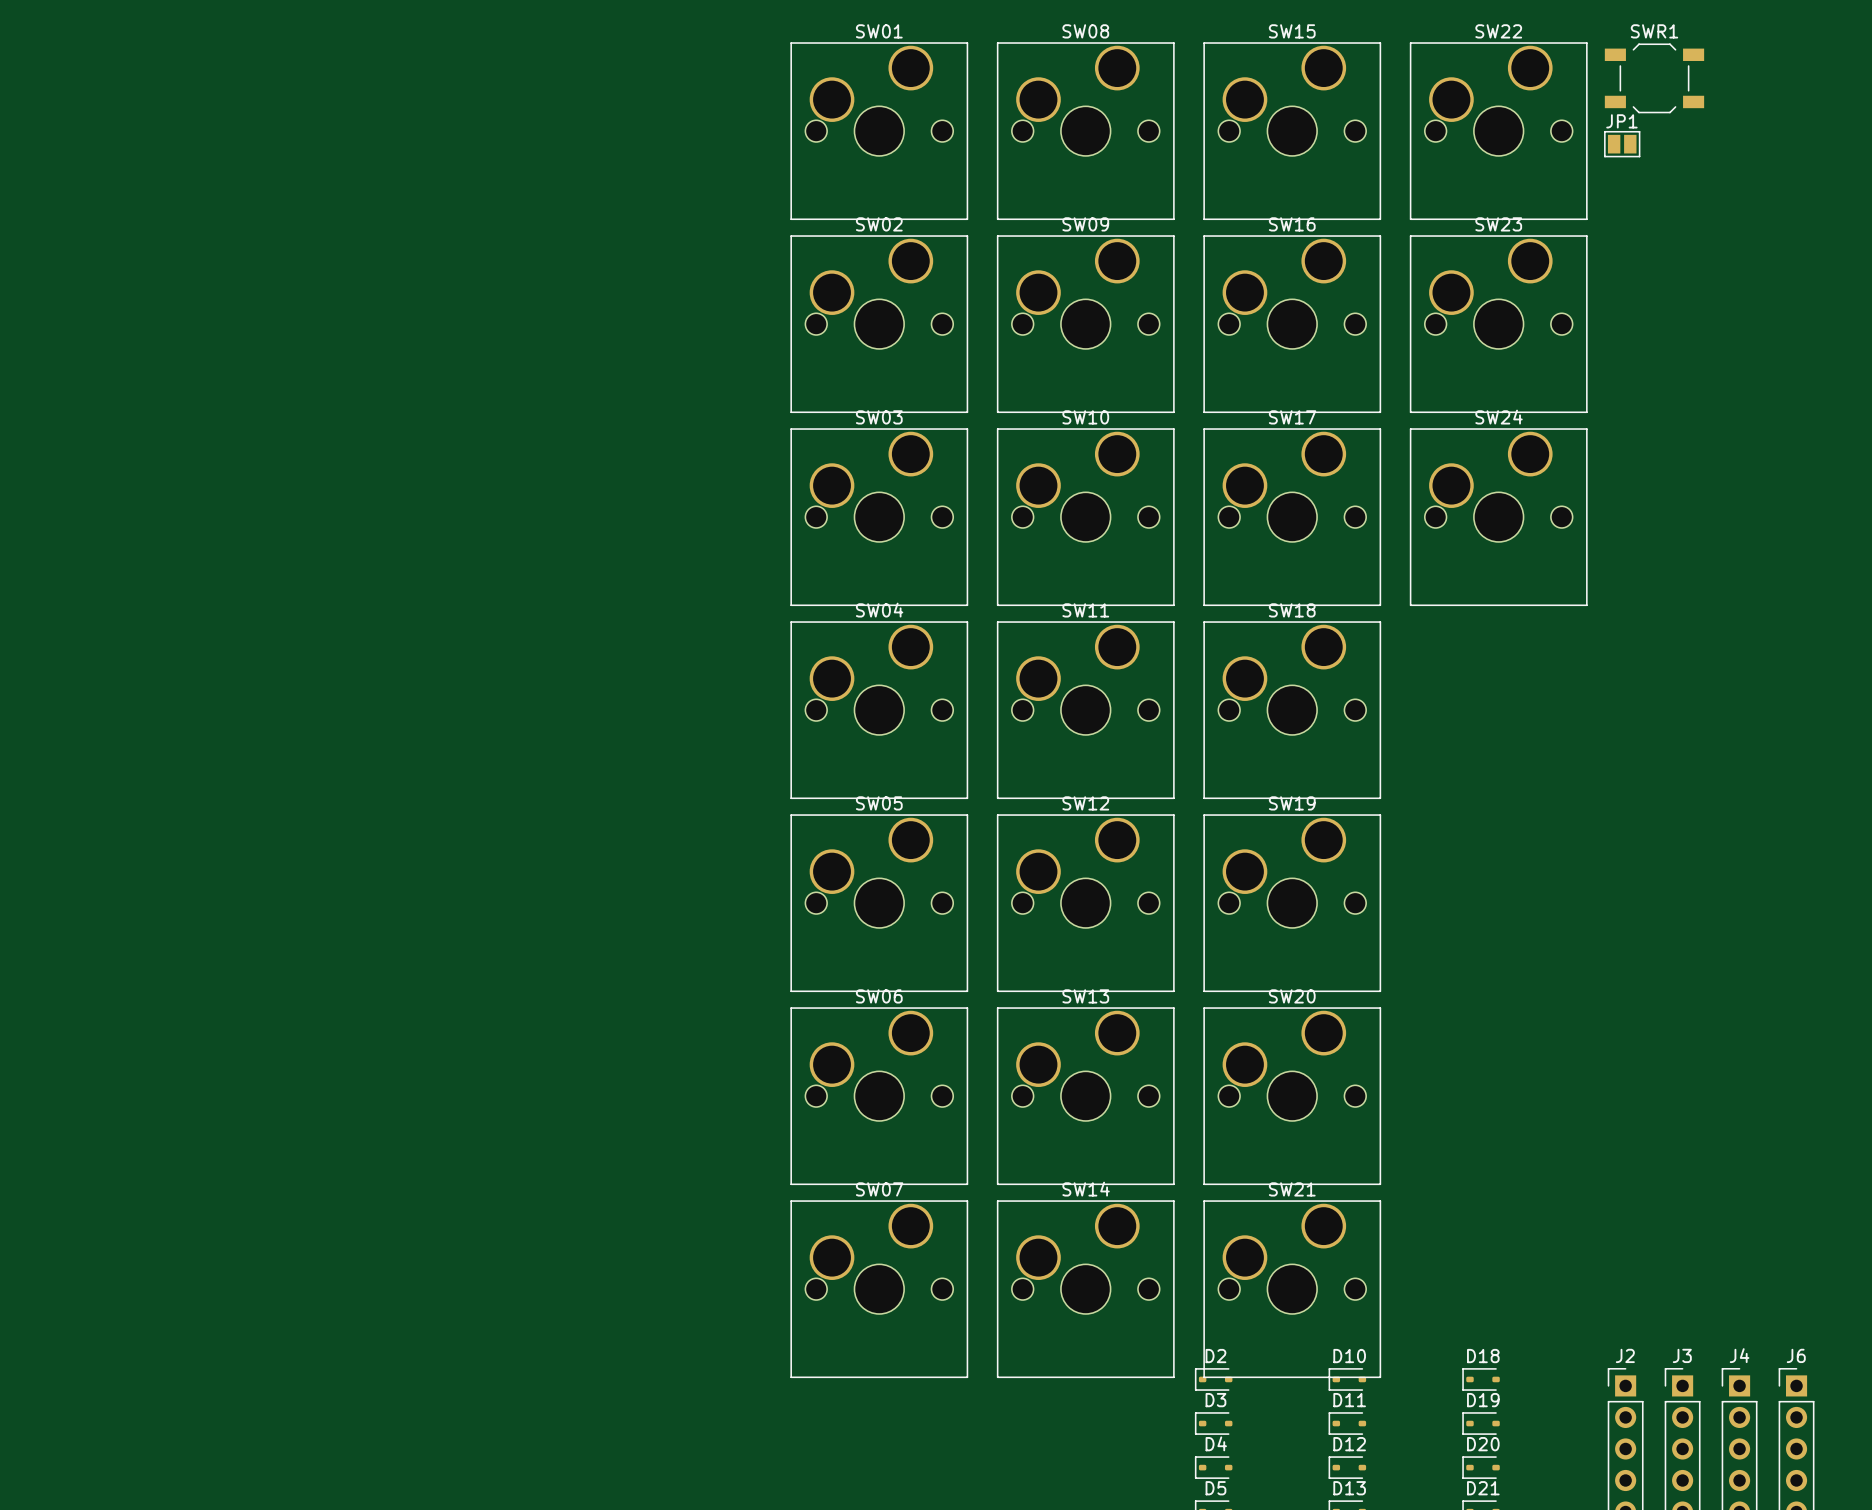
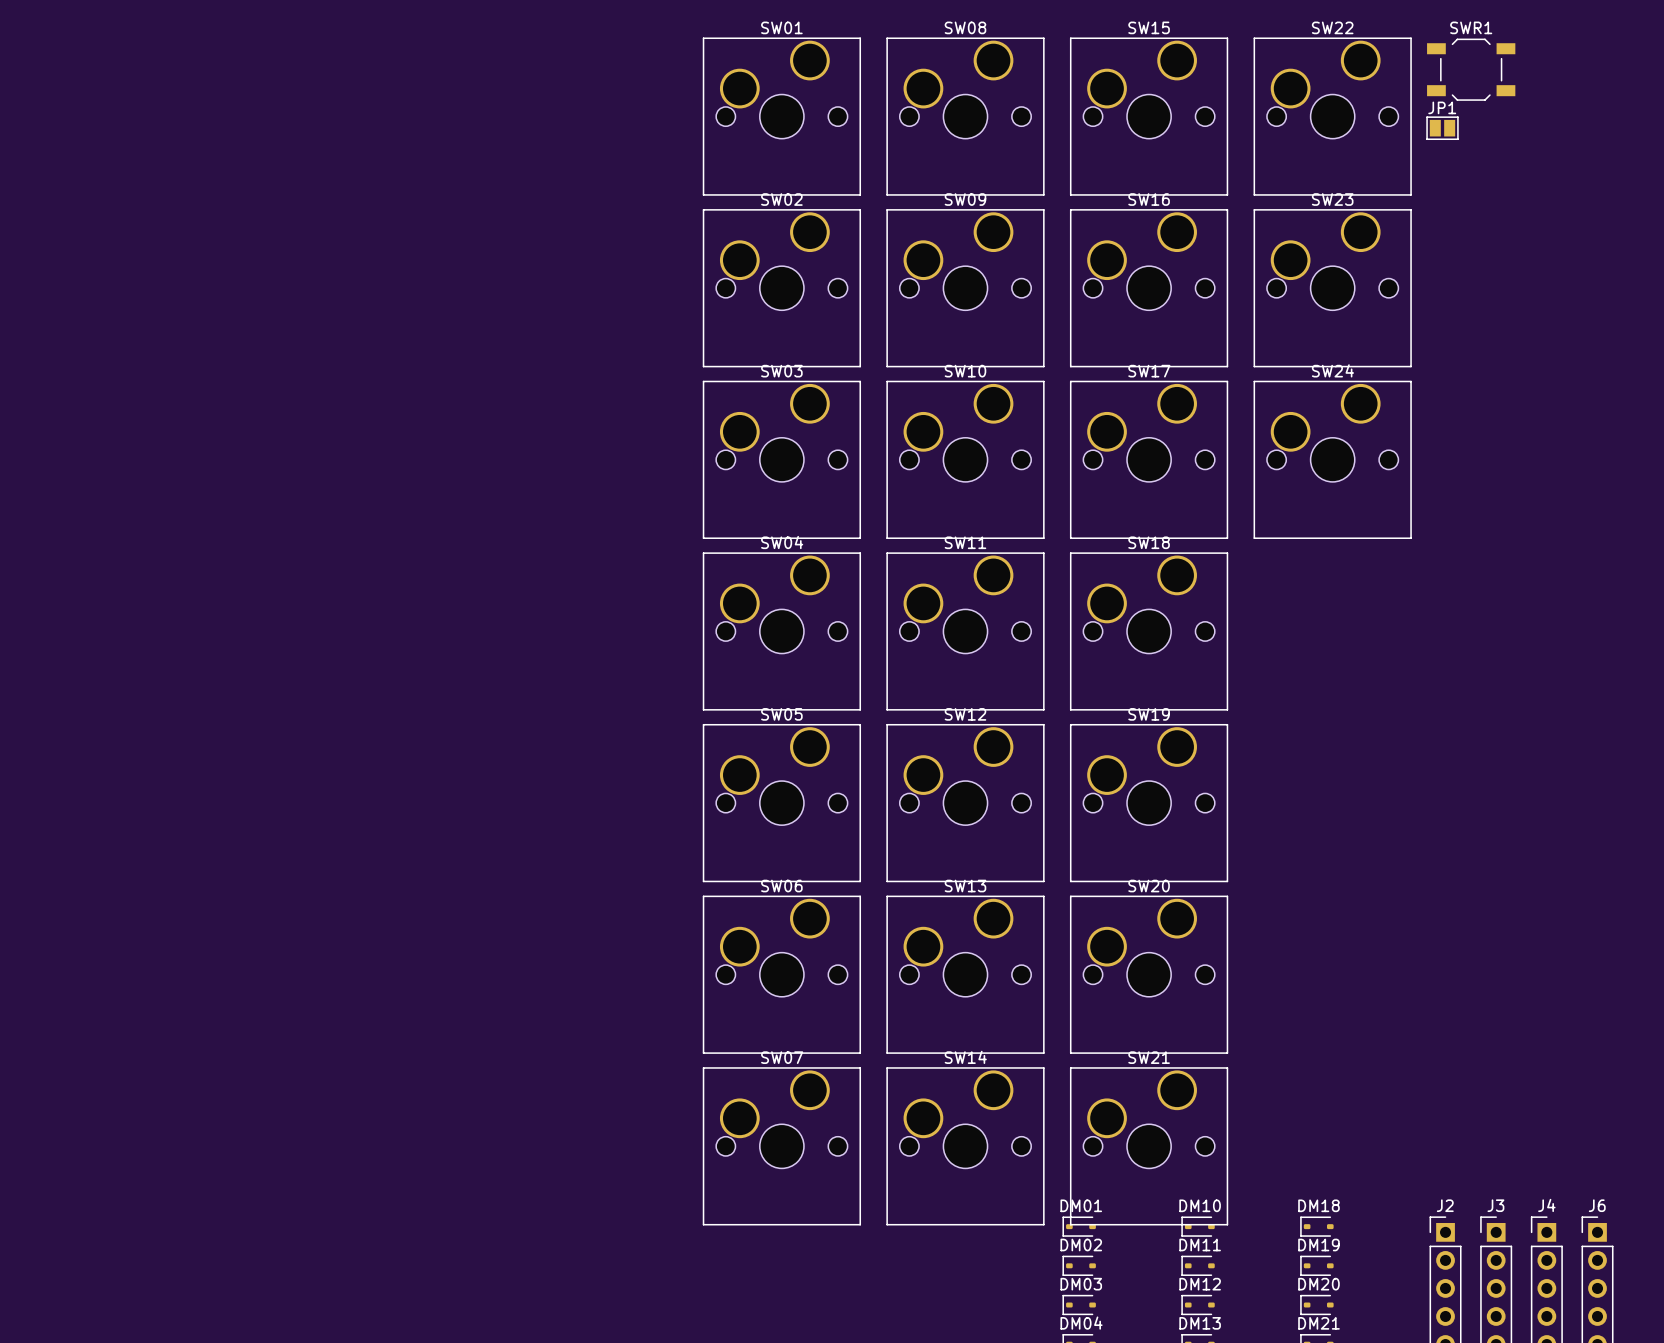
D2 name: D2 (1215, 1356) -> DM01 (1081, 1205)
D10 name: D10 (1349, 1356) -> DM10 (1200, 1205)
D18 name: D18 (1483, 1356) -> DM18 (1318, 1205)
D3 name: D3 (1215, 1400) -> DM02 (1081, 1244)
D11 name: D11 (1349, 1400) -> DM11 (1200, 1244)
D19 name: D19 (1483, 1400) -> DM19 (1318, 1244)
D4 name: D4 (1216, 1443) -> DM03 (1081, 1284)
D12 name: D12 (1349, 1444) -> DM12 (1200, 1284)
D20 name: D20 (1483, 1444) -> DM20 (1318, 1284)
D5 name: D5 (1215, 1488) -> DM04 (1081, 1323)
D13 name: D13 (1349, 1488) -> DM13 (1200, 1323)
D21 name: D21 (1483, 1488) -> DM21 (1318, 1323)

